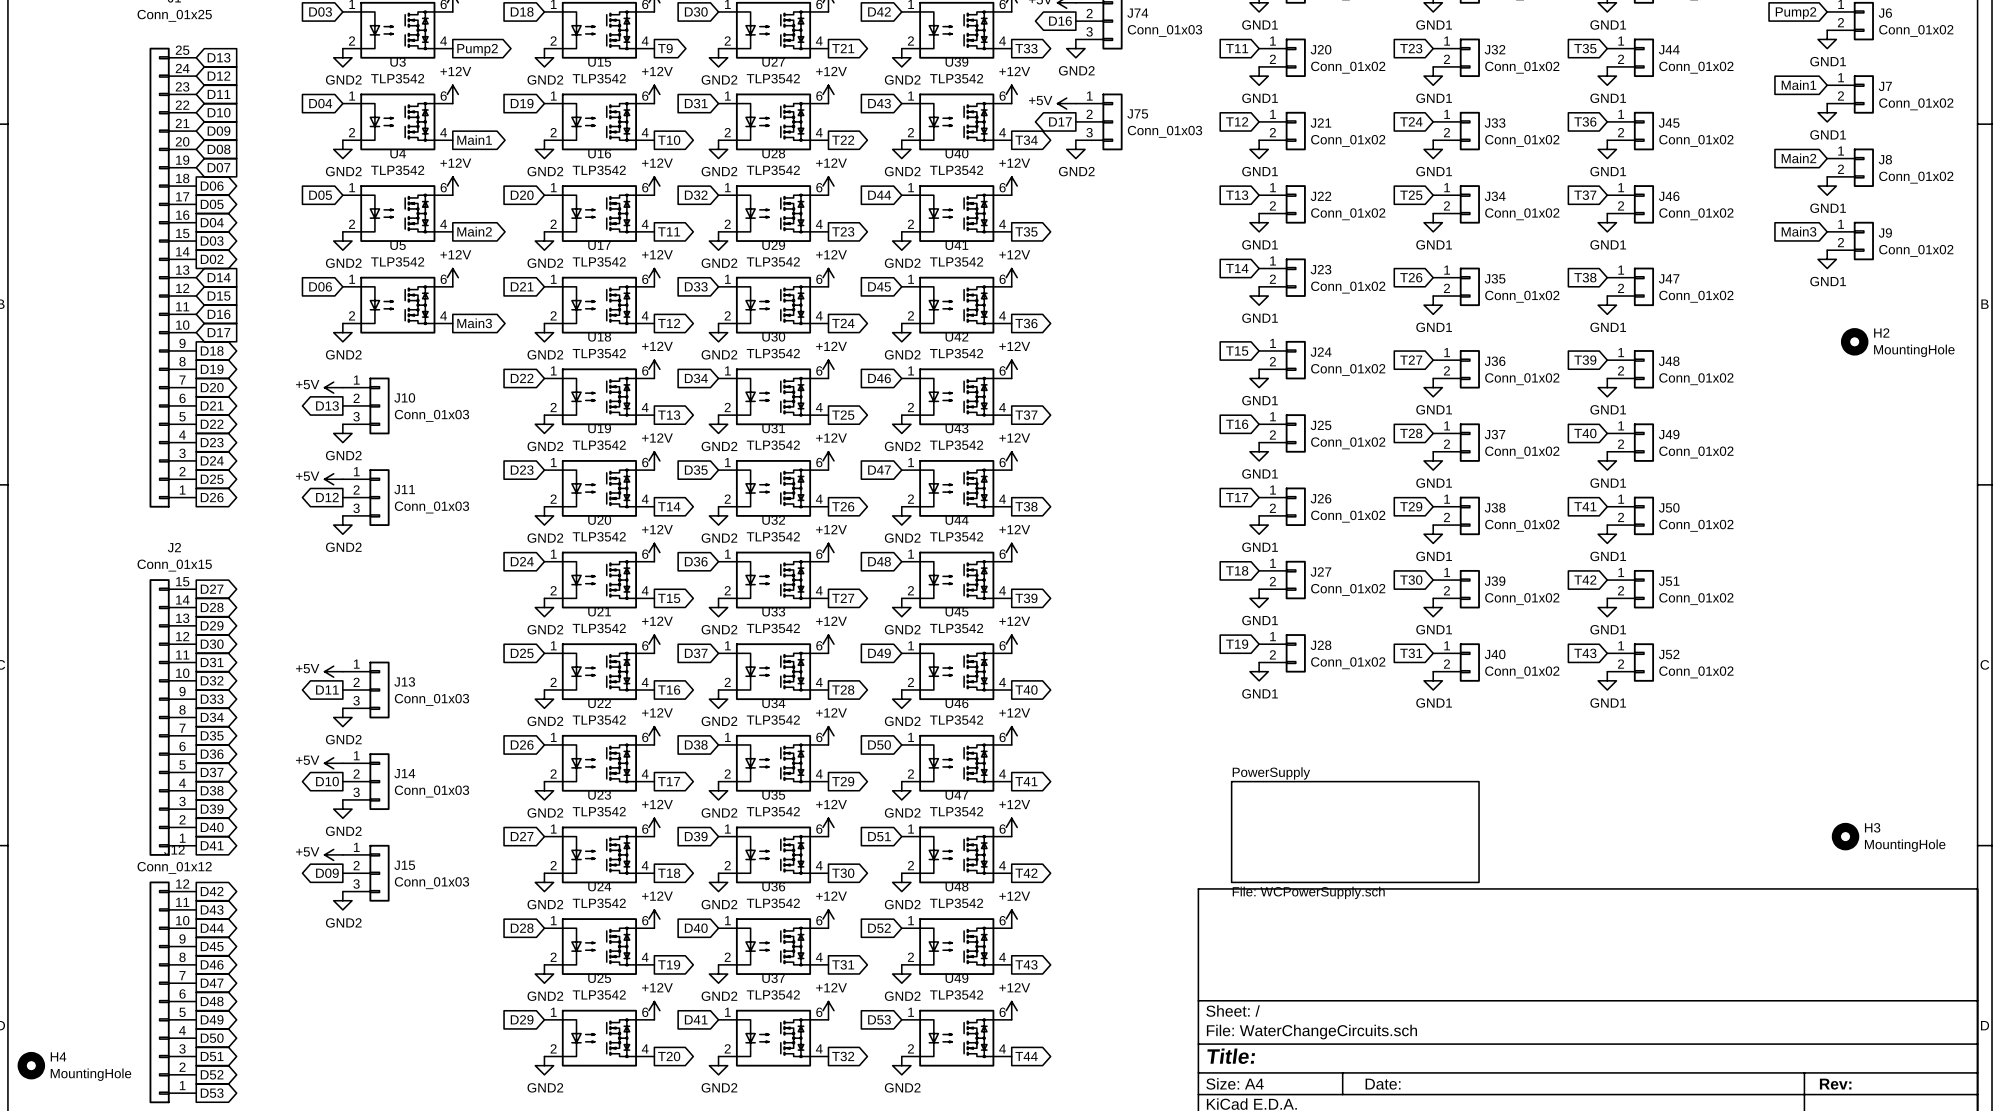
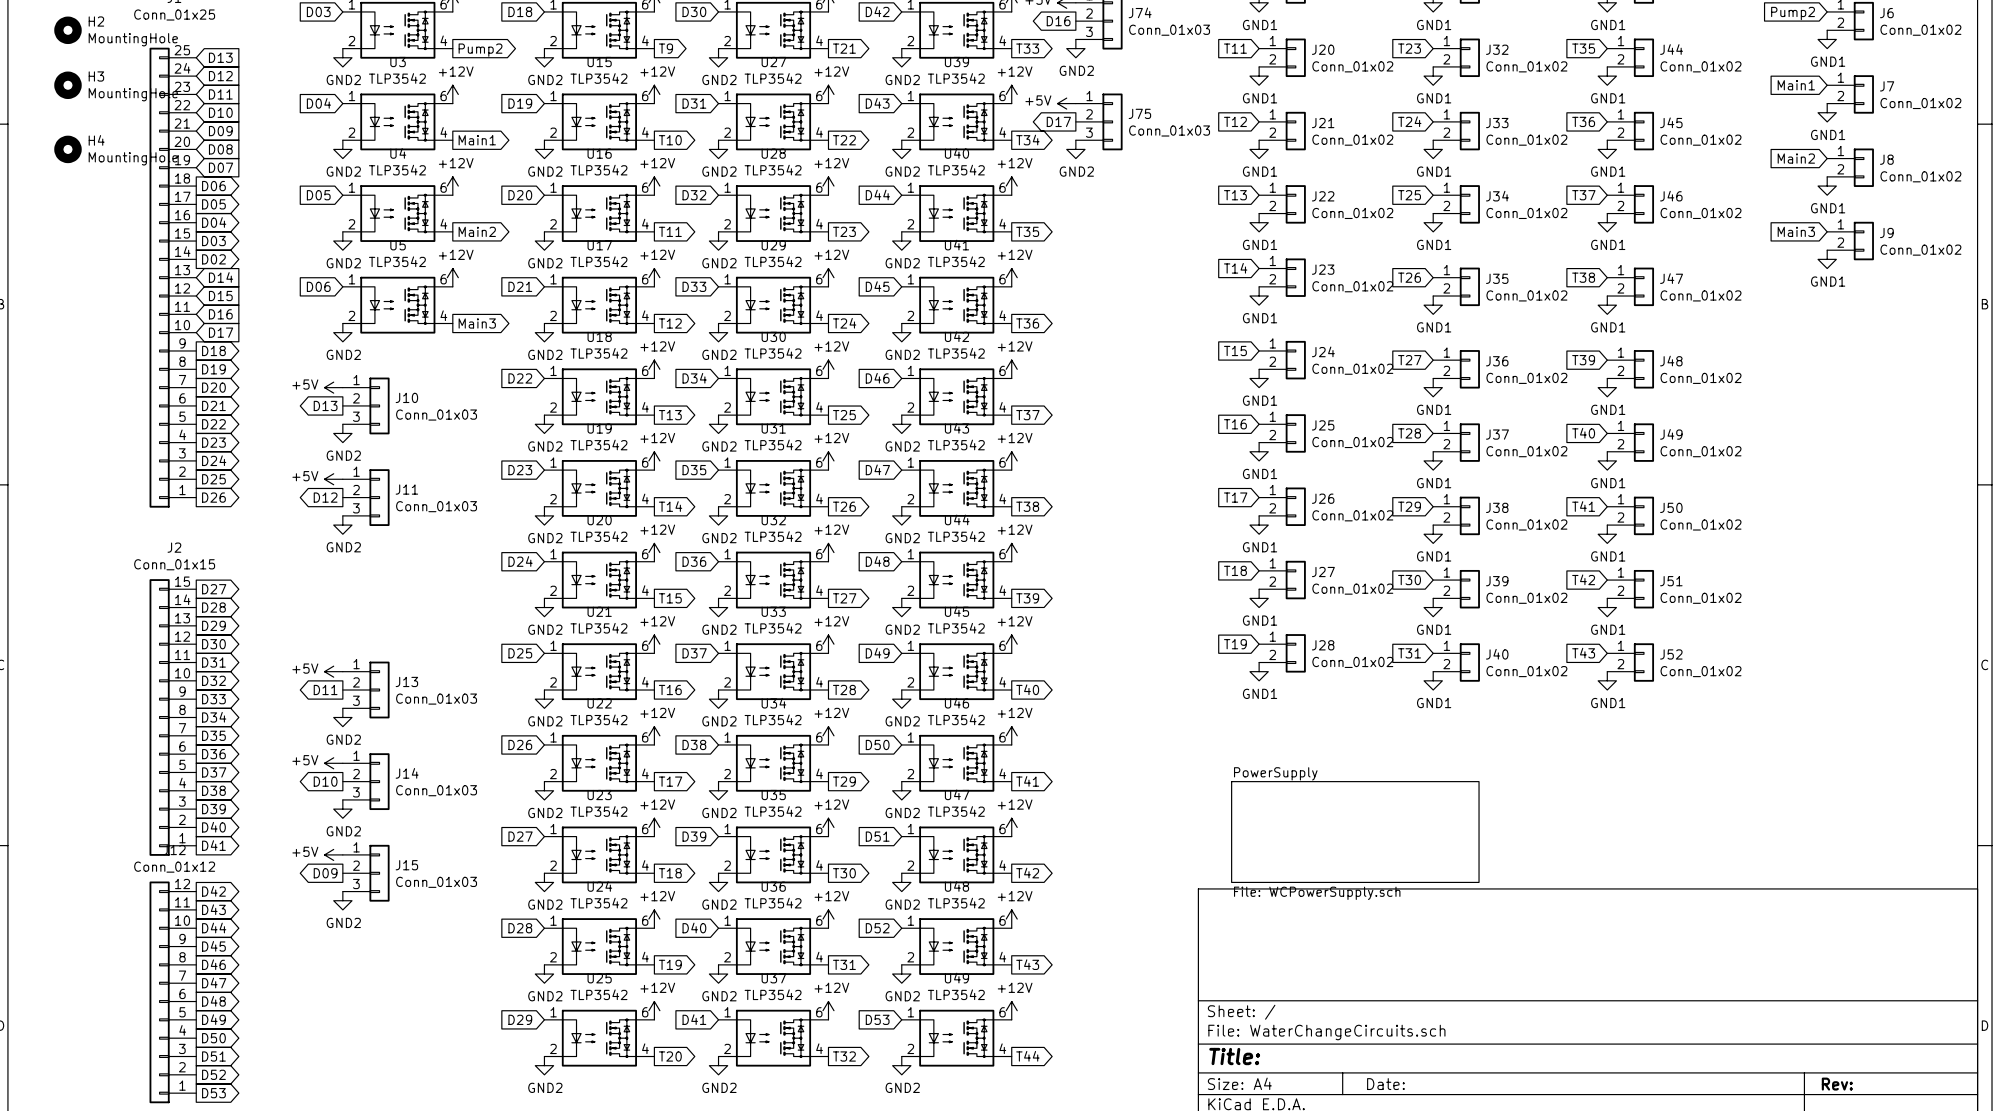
H2 position: (1854, 341) -> (67, 30)
H3 position: (1845, 836) -> (67, 85)
H4 position: (31, 1065) -> (67, 149)

